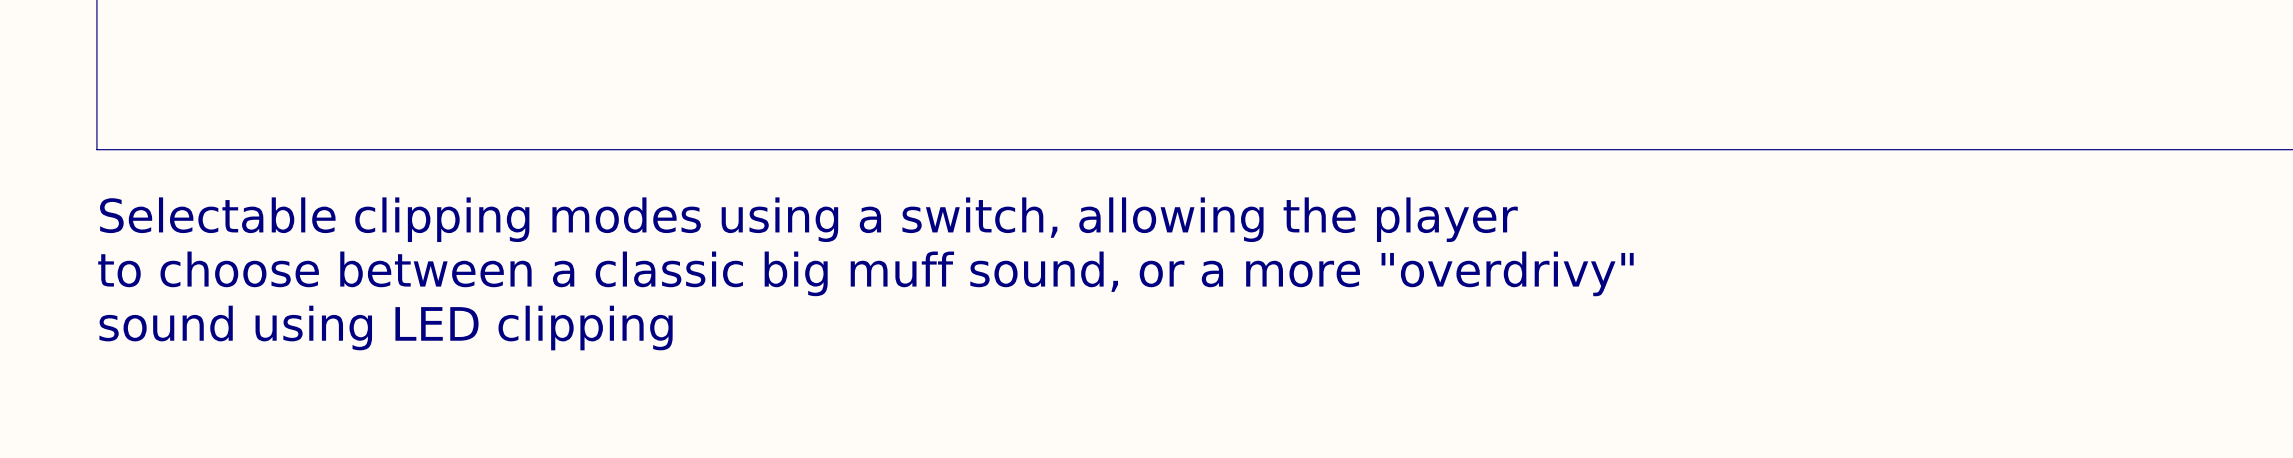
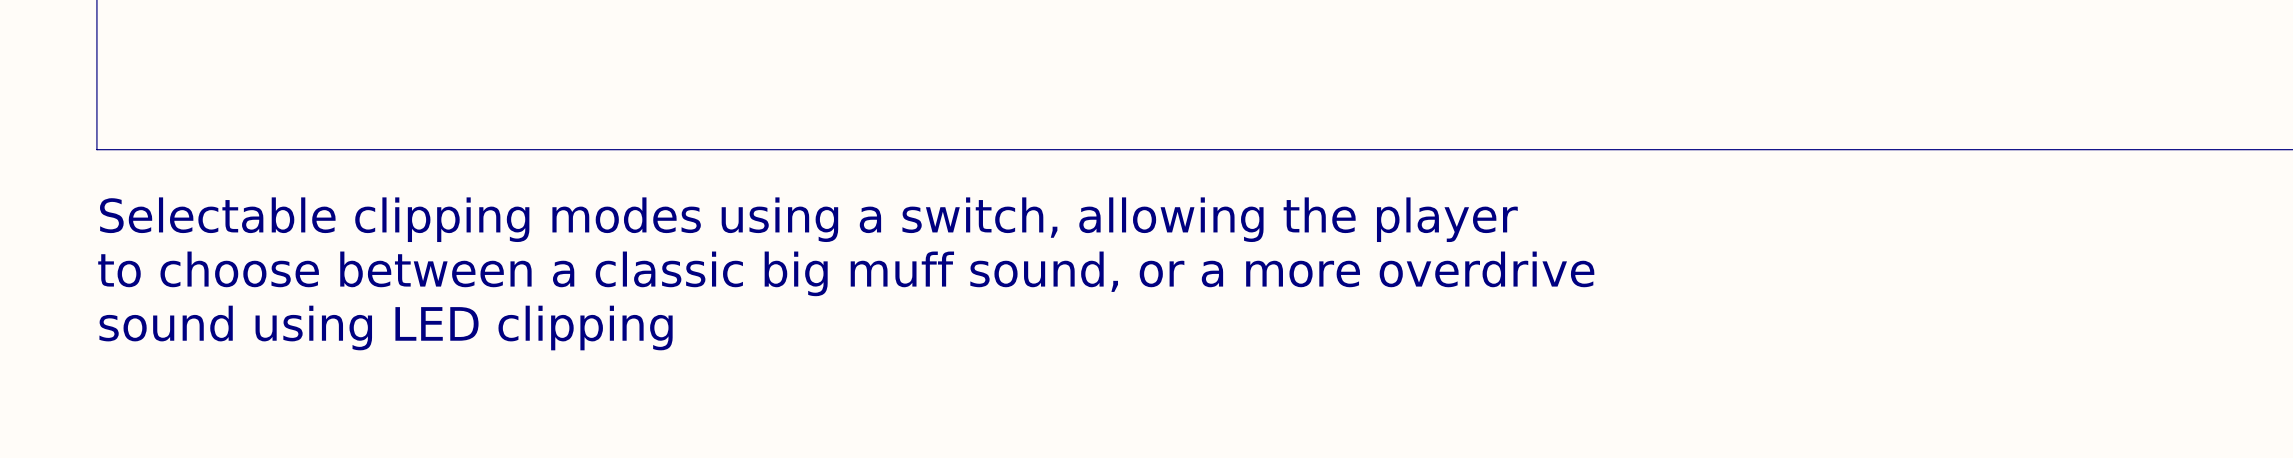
text: to choose between a classic big muff sound, or a more "overdrivy" (865, 273) -> to choose between a classic big muff sound, or a more overdrive (846, 273)

